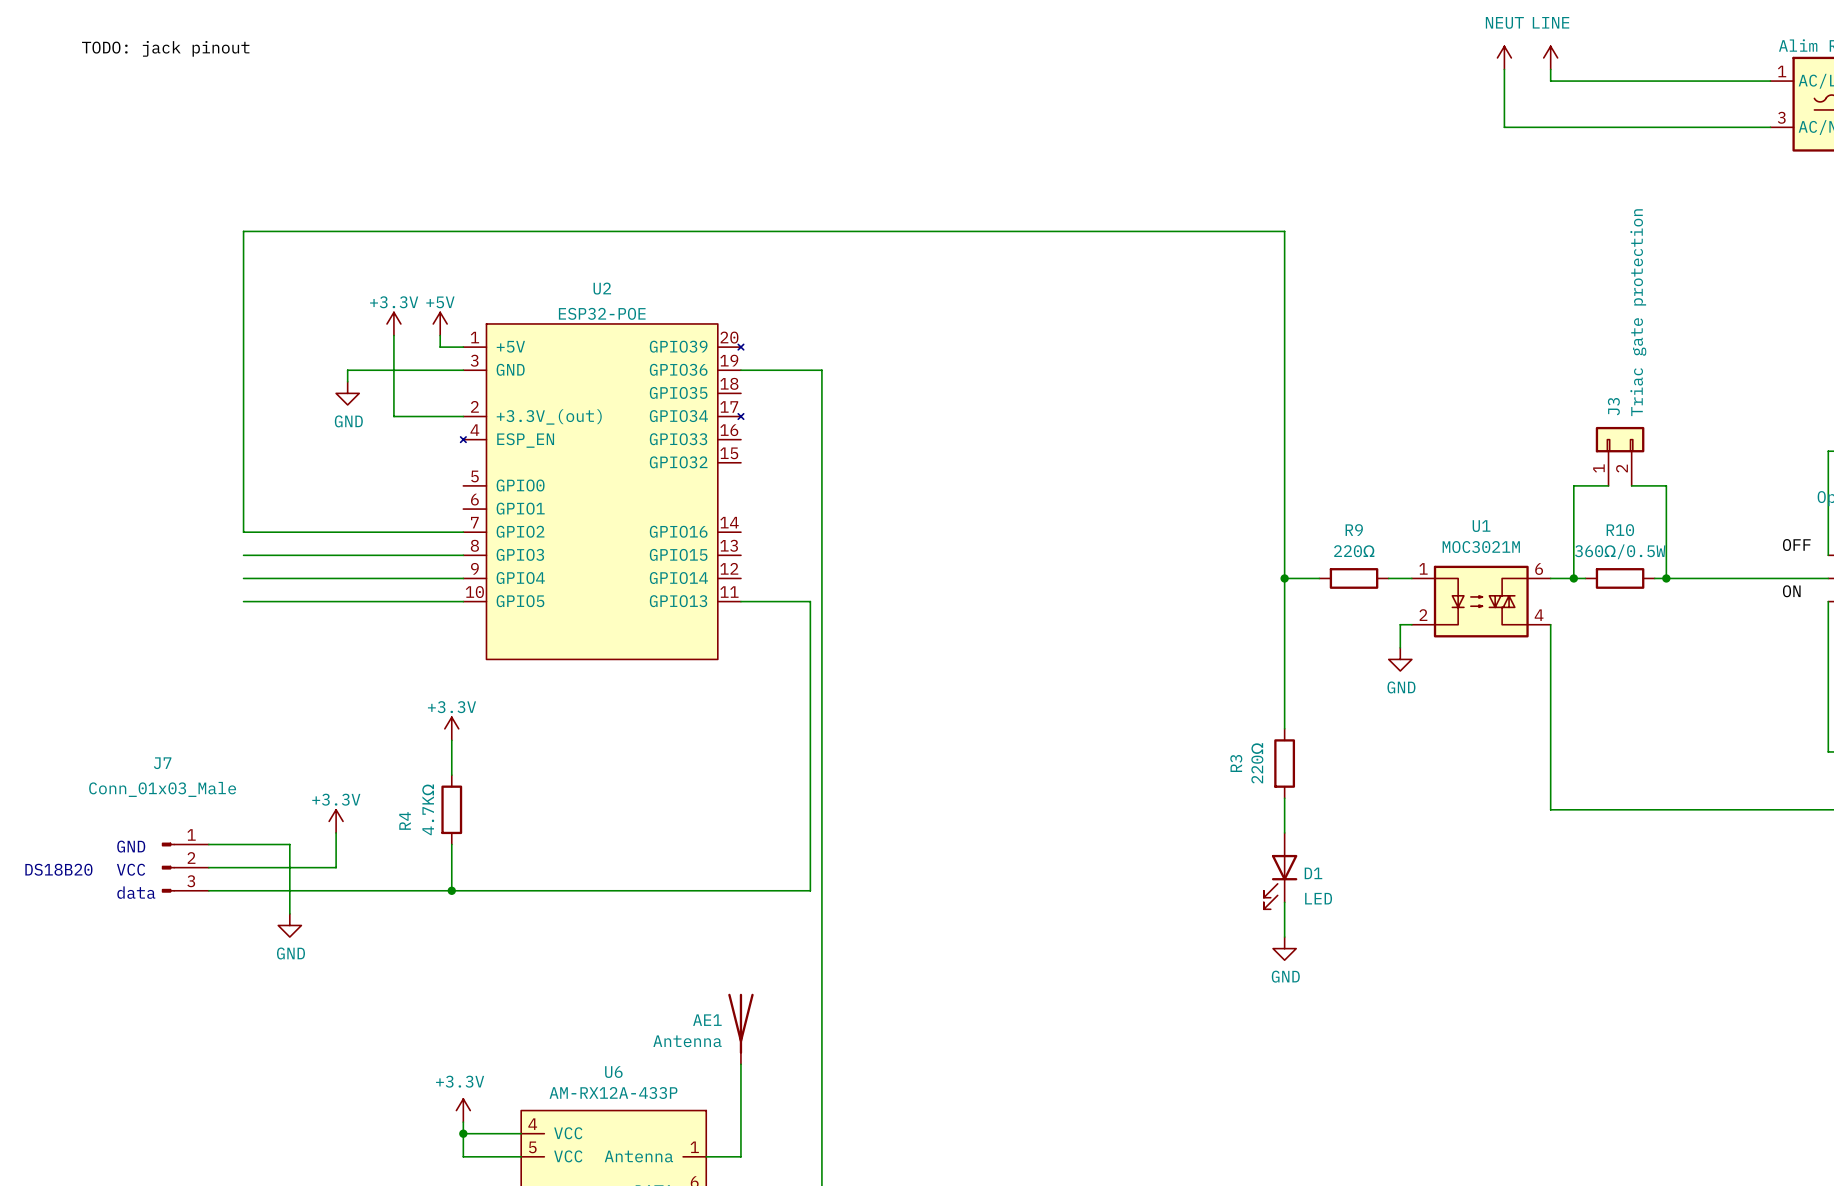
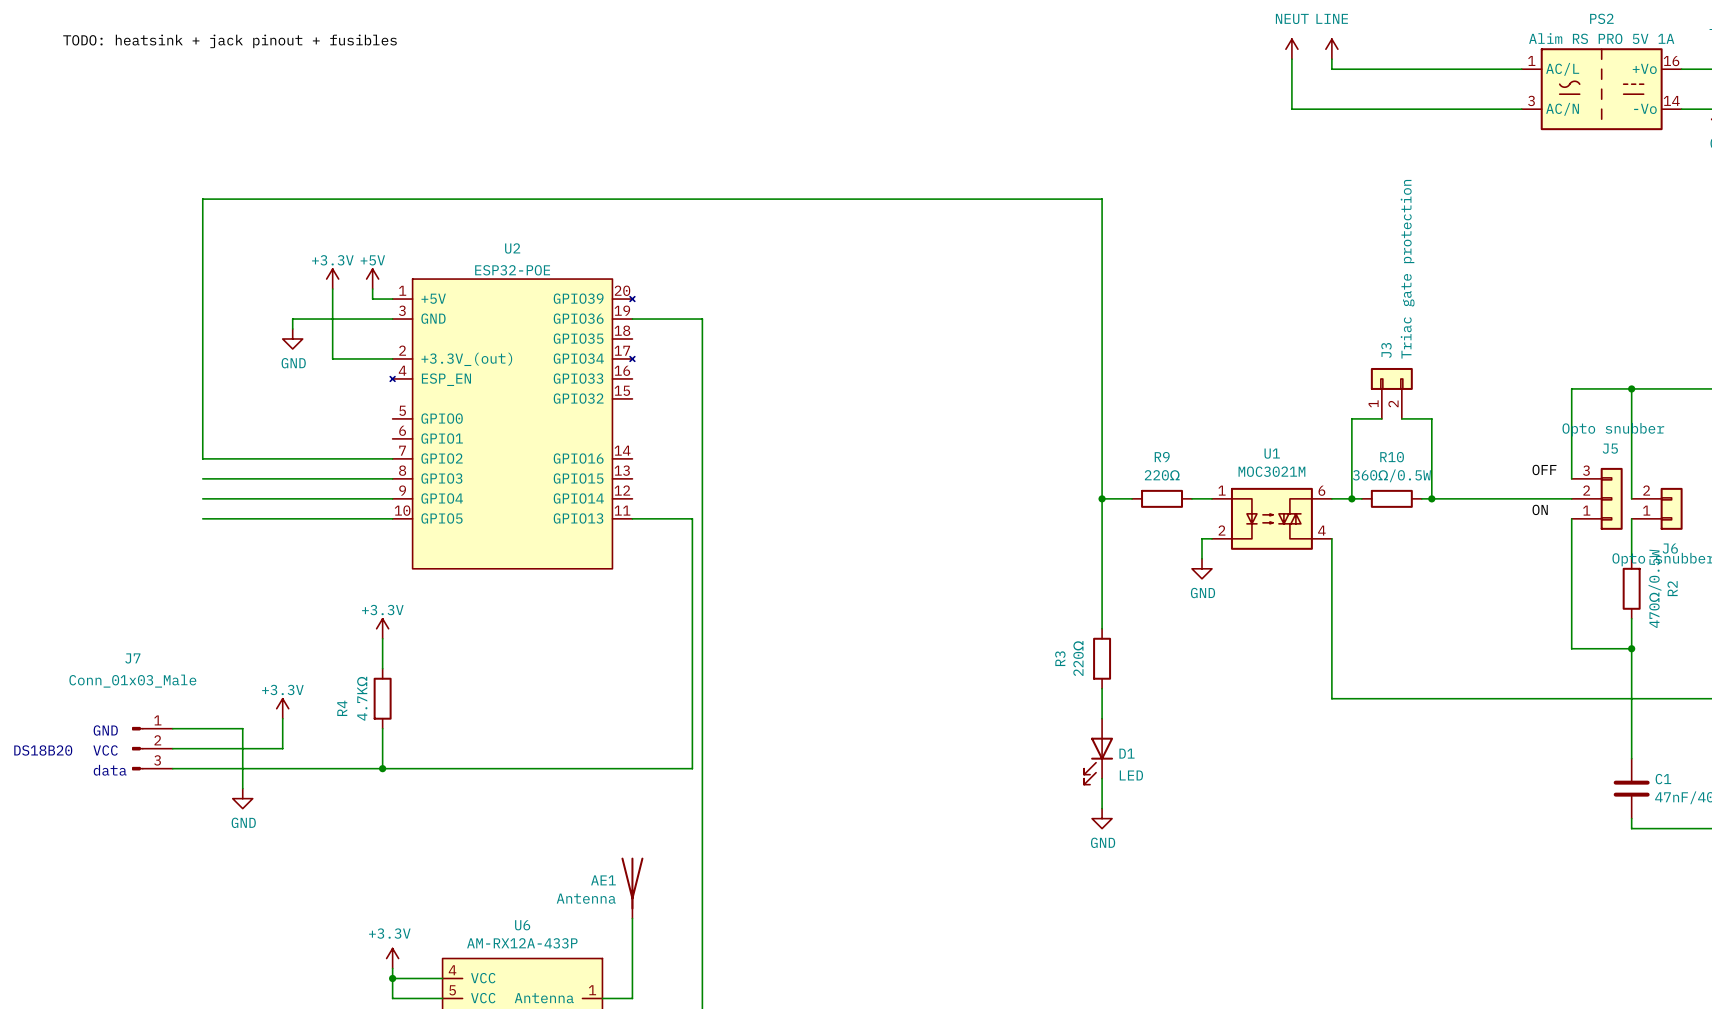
label: TODO: jack pinout (165, 48) -> TODO: heatsink + jack pinout + fusibles (230, 41)

